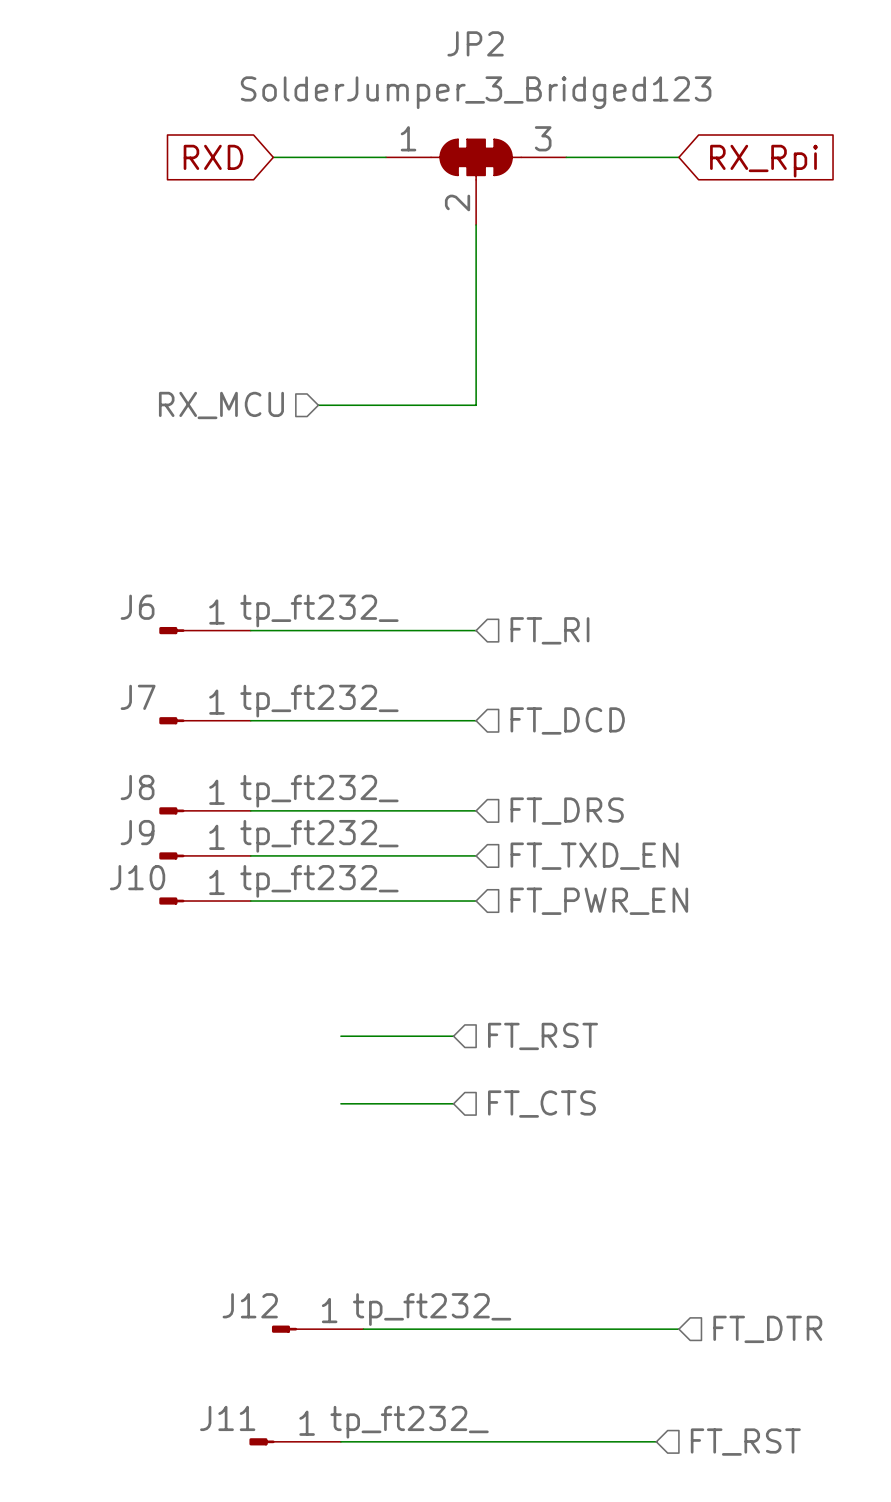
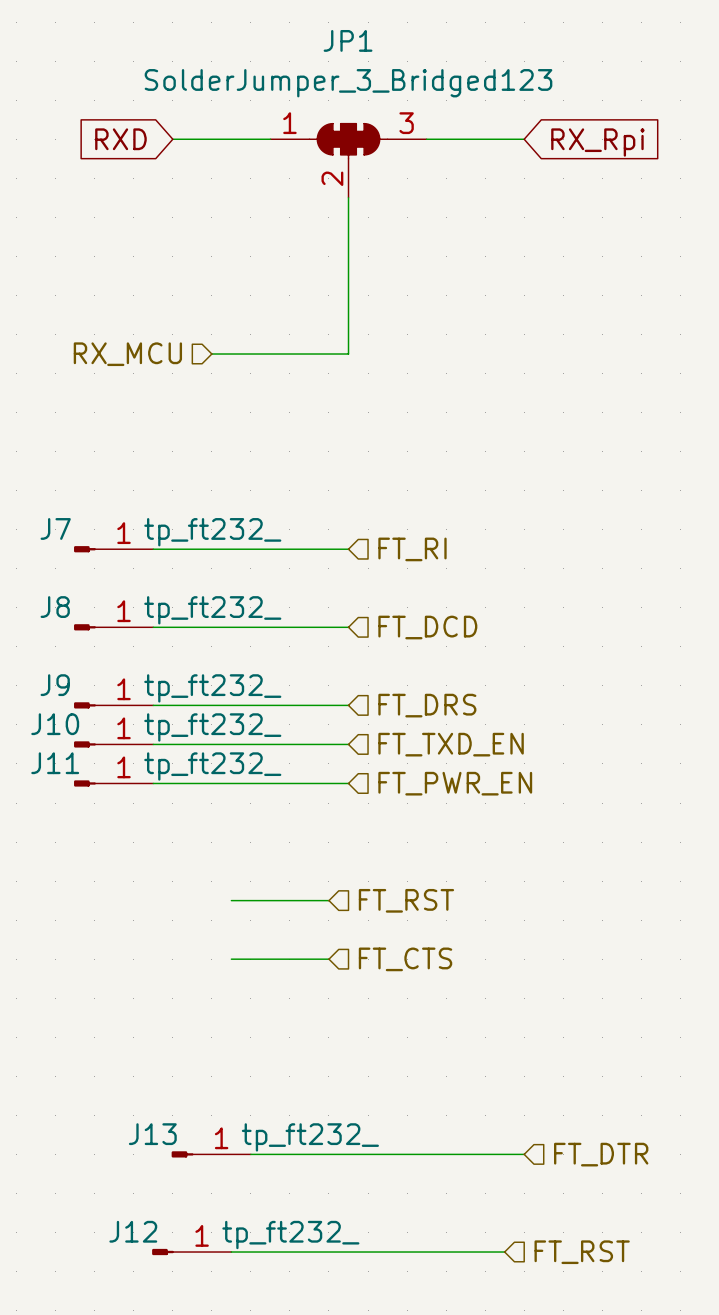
JP2 name: JP2 (475, 43) -> JP1 (348, 40)
J6 name: J6 (137, 607) -> J7 (55, 528)
J7 name: J7 (138, 697) -> J8 (55, 607)
J8 name: J8 (137, 787) -> J9 (55, 685)
J9 name: J9 (137, 832) -> J10 (55, 724)
J10 name: J10 (137, 877) -> J11 (55, 763)
J12 name: J12 (250, 1305) -> J13 (152, 1134)
J11 name: J11 (227, 1418) -> J12 (133, 1231)

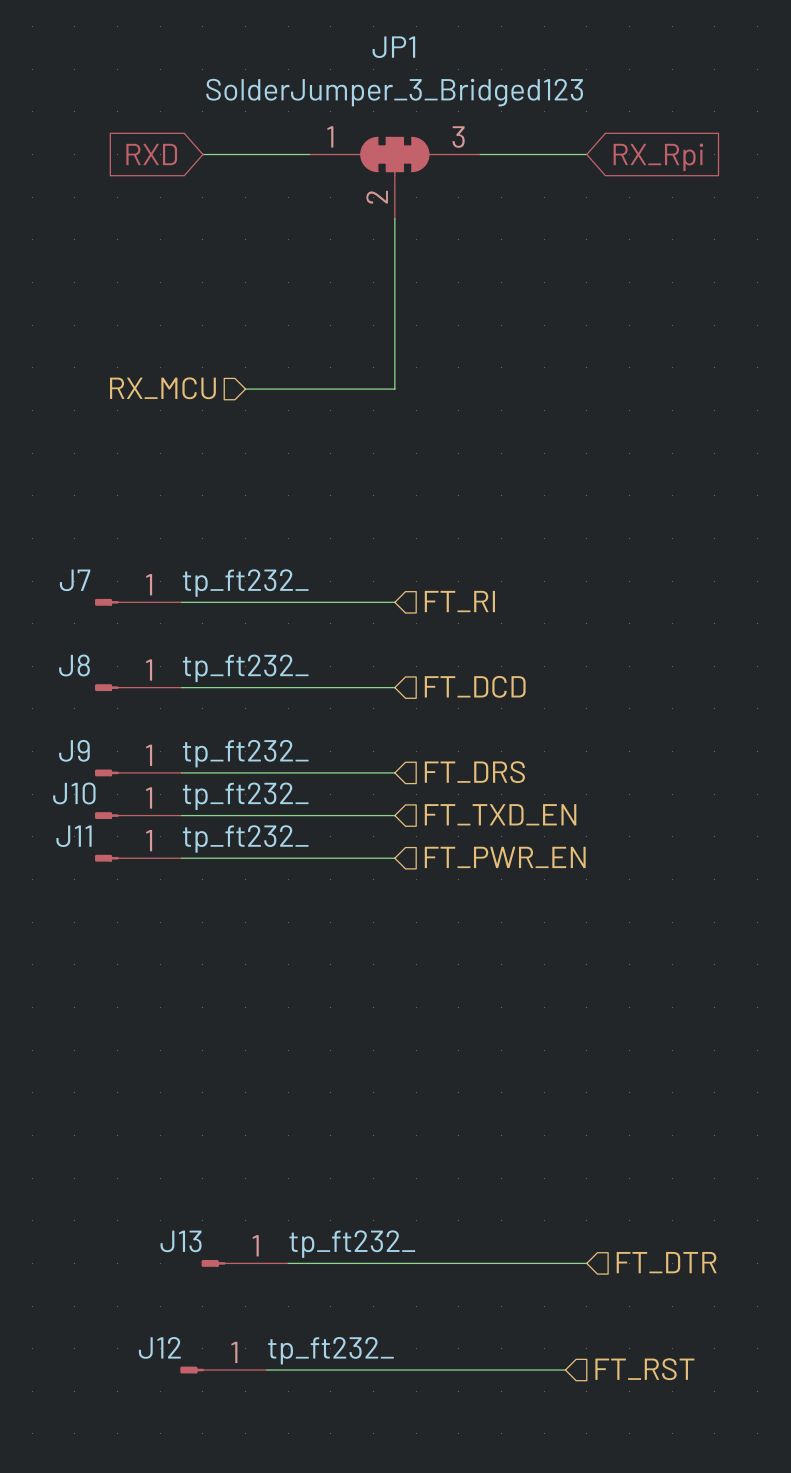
wire: (231, 900) (328, 900) -> none
hierarchical label: FT_RST (406, 900) -> none
wire: (231, 959) (328, 959) -> none
hierarchical label: FT_CTS (405, 959) -> none

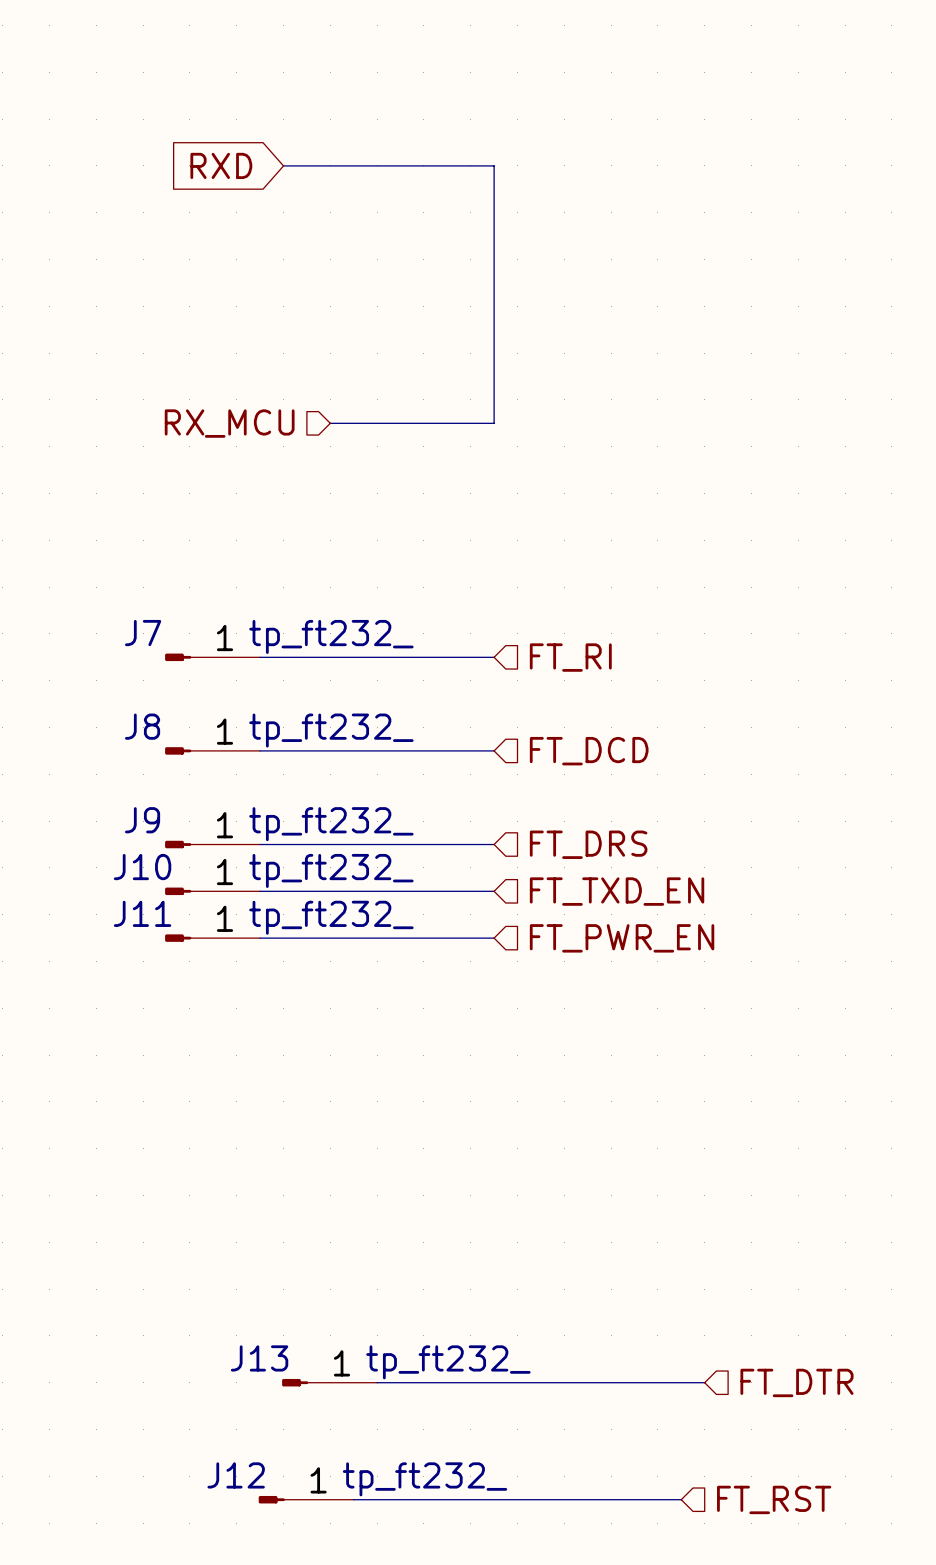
wire: (480, 154) (586, 154) -> none
global label: RX_Rpi (658, 157) -> none
JP1: SolderJumper_3_Bridged123 (394, 177) -> none

